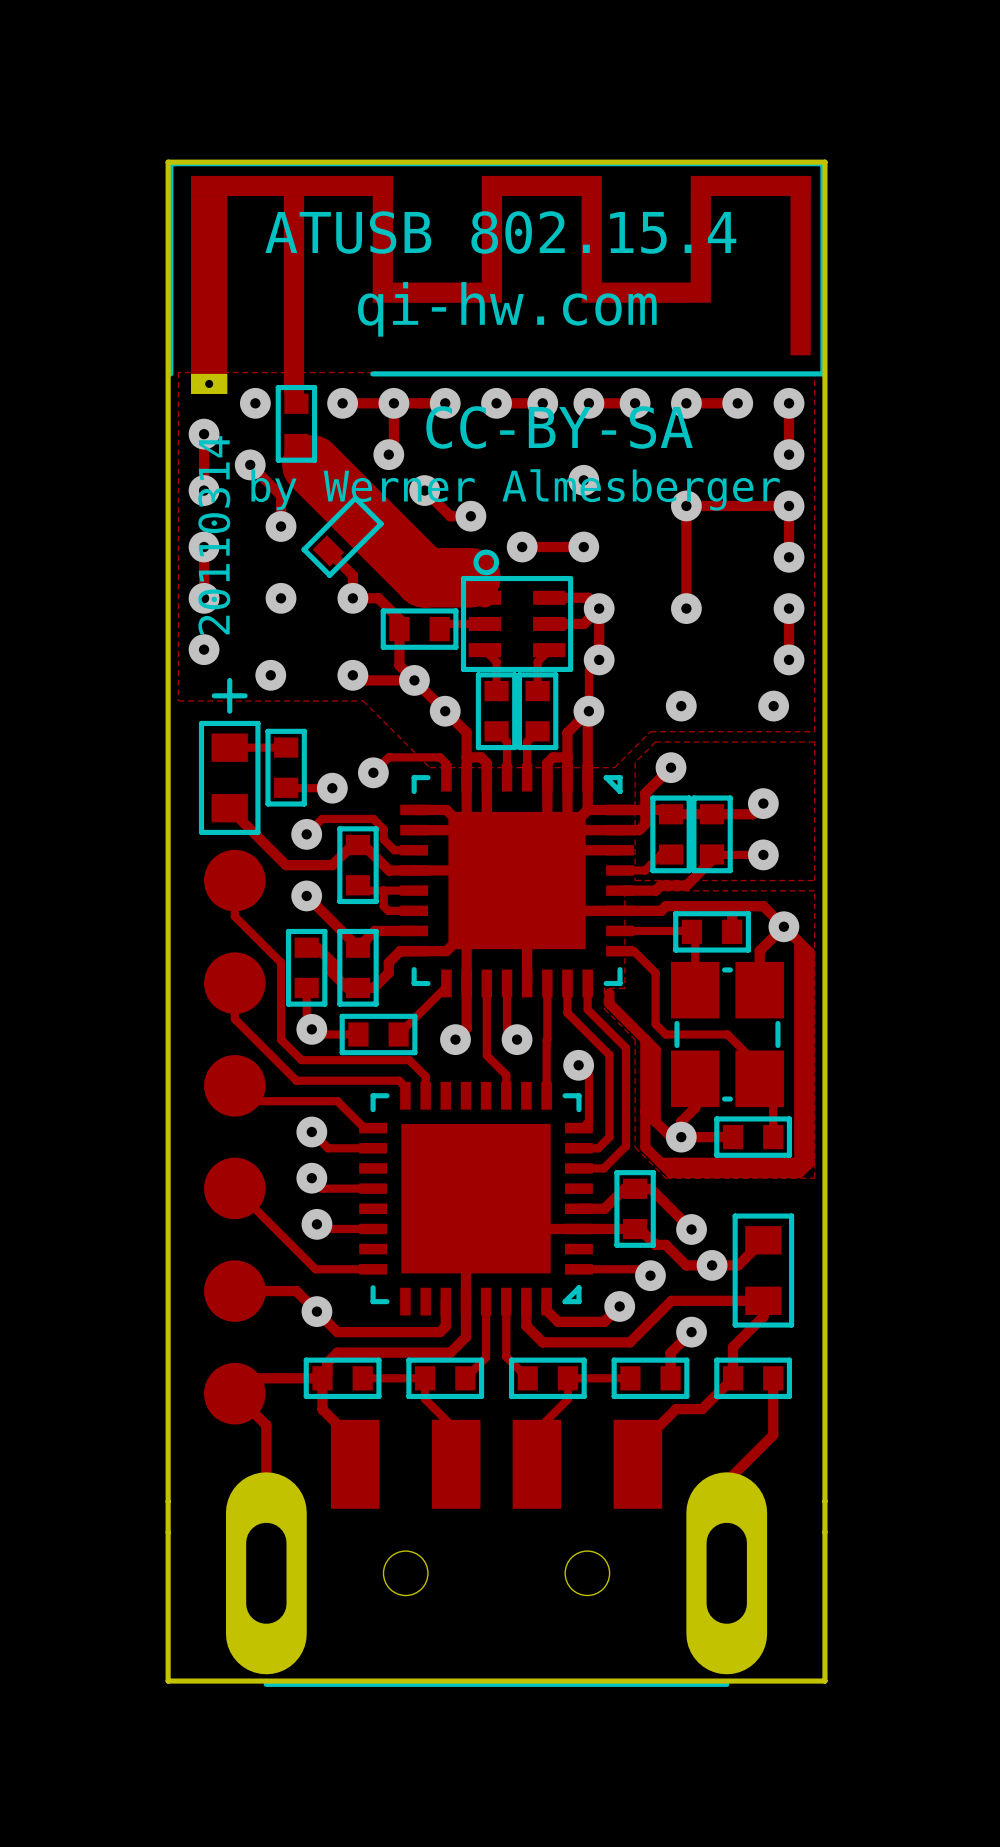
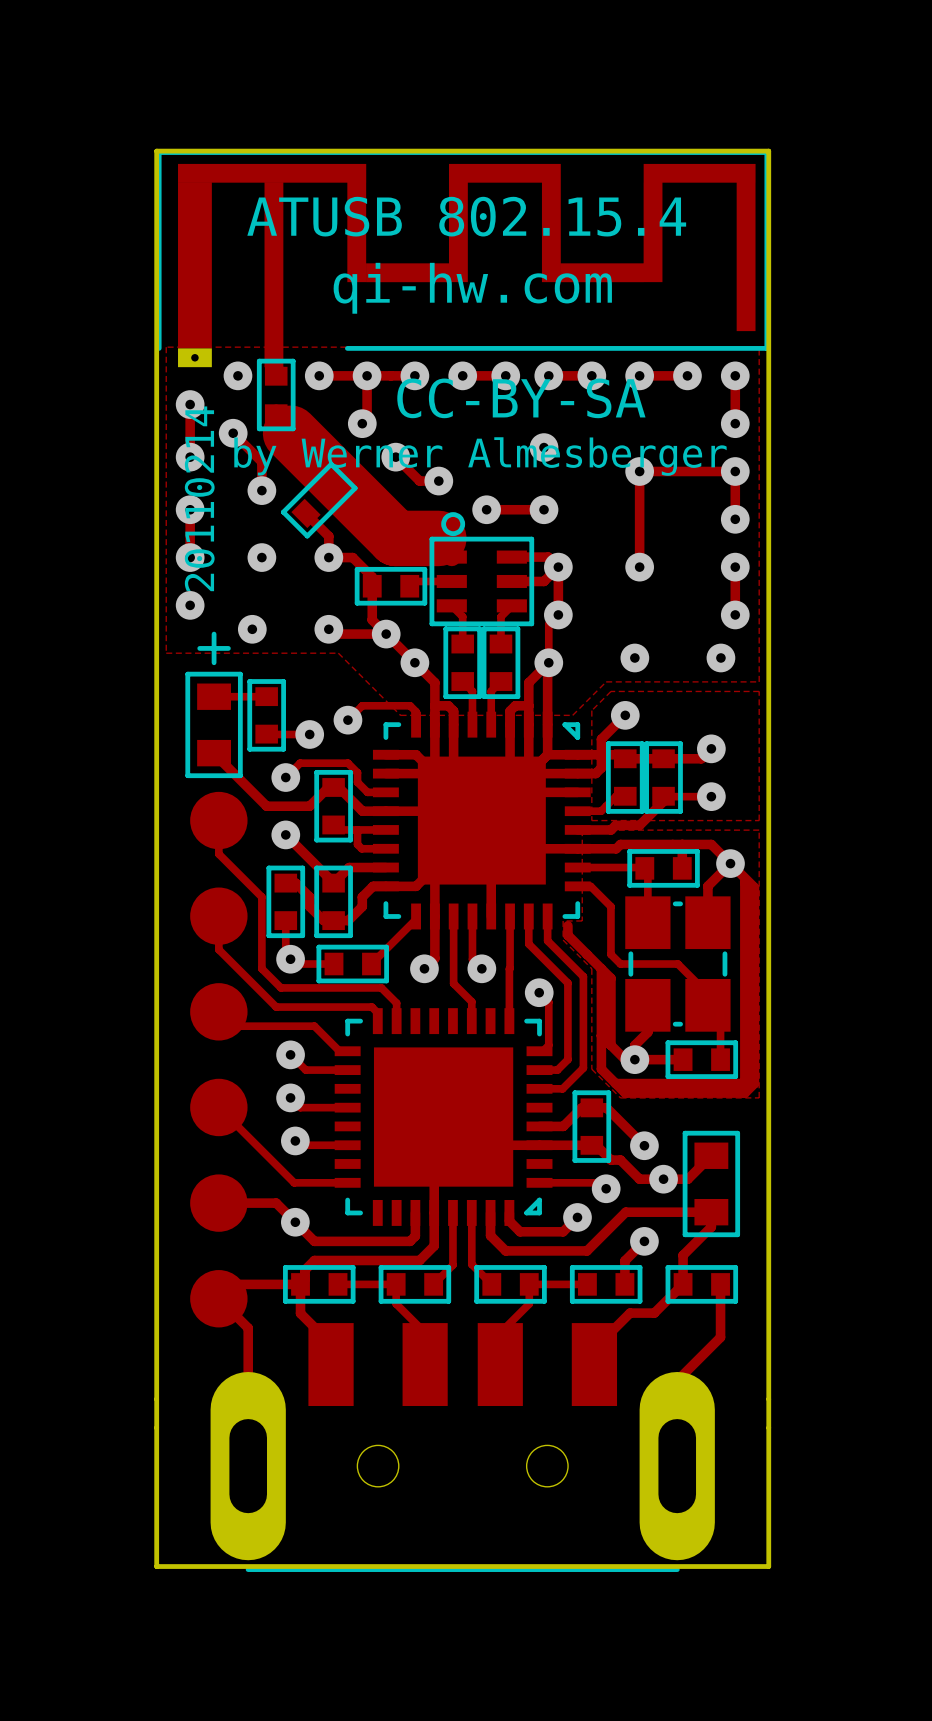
text: 20110314 (214, 535) -> 20110214 (199, 498)

